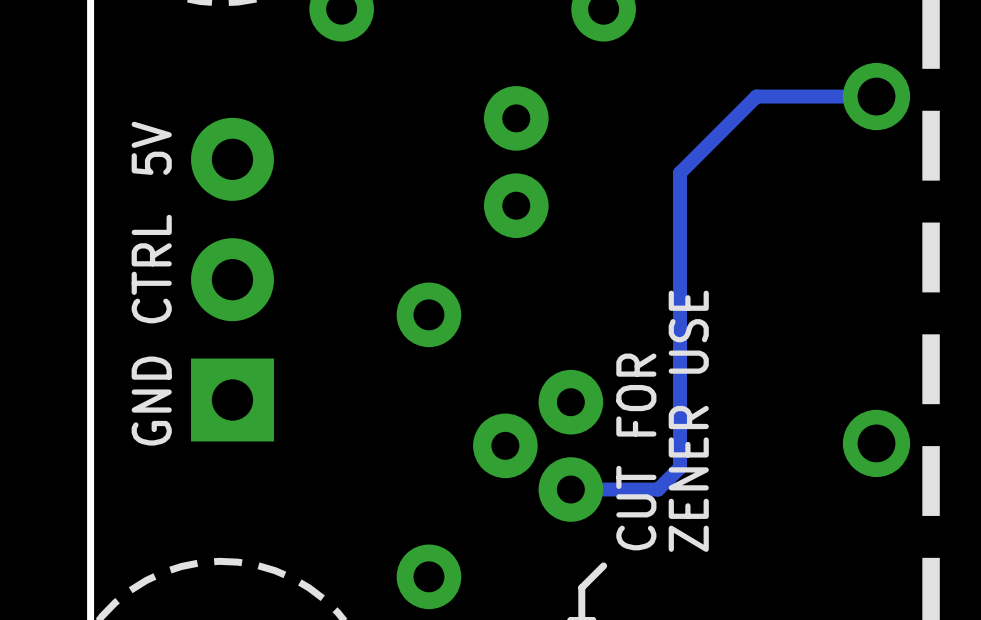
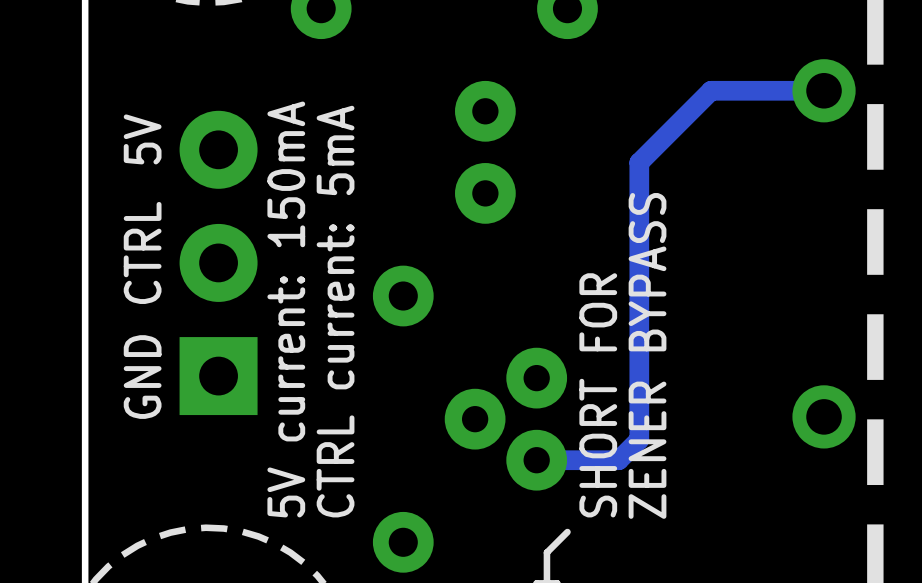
track width: thin (876, 96) (756, 96) (680, 172) (680, 467) (658, 489) (570, 489) -> thick (824, 90) (711, 90) (639, 162) (639, 439) (618, 460) (536, 460)
text: none -> 5V current: 150mA (286, 309)
text: none -> CTRL current: 5mA (335, 311)
text: ZENER USE (688, 421) -> ZENER BYPASS (647, 355)
text: CUT FOR (636, 451) -> SHORT FOR (598, 395)

